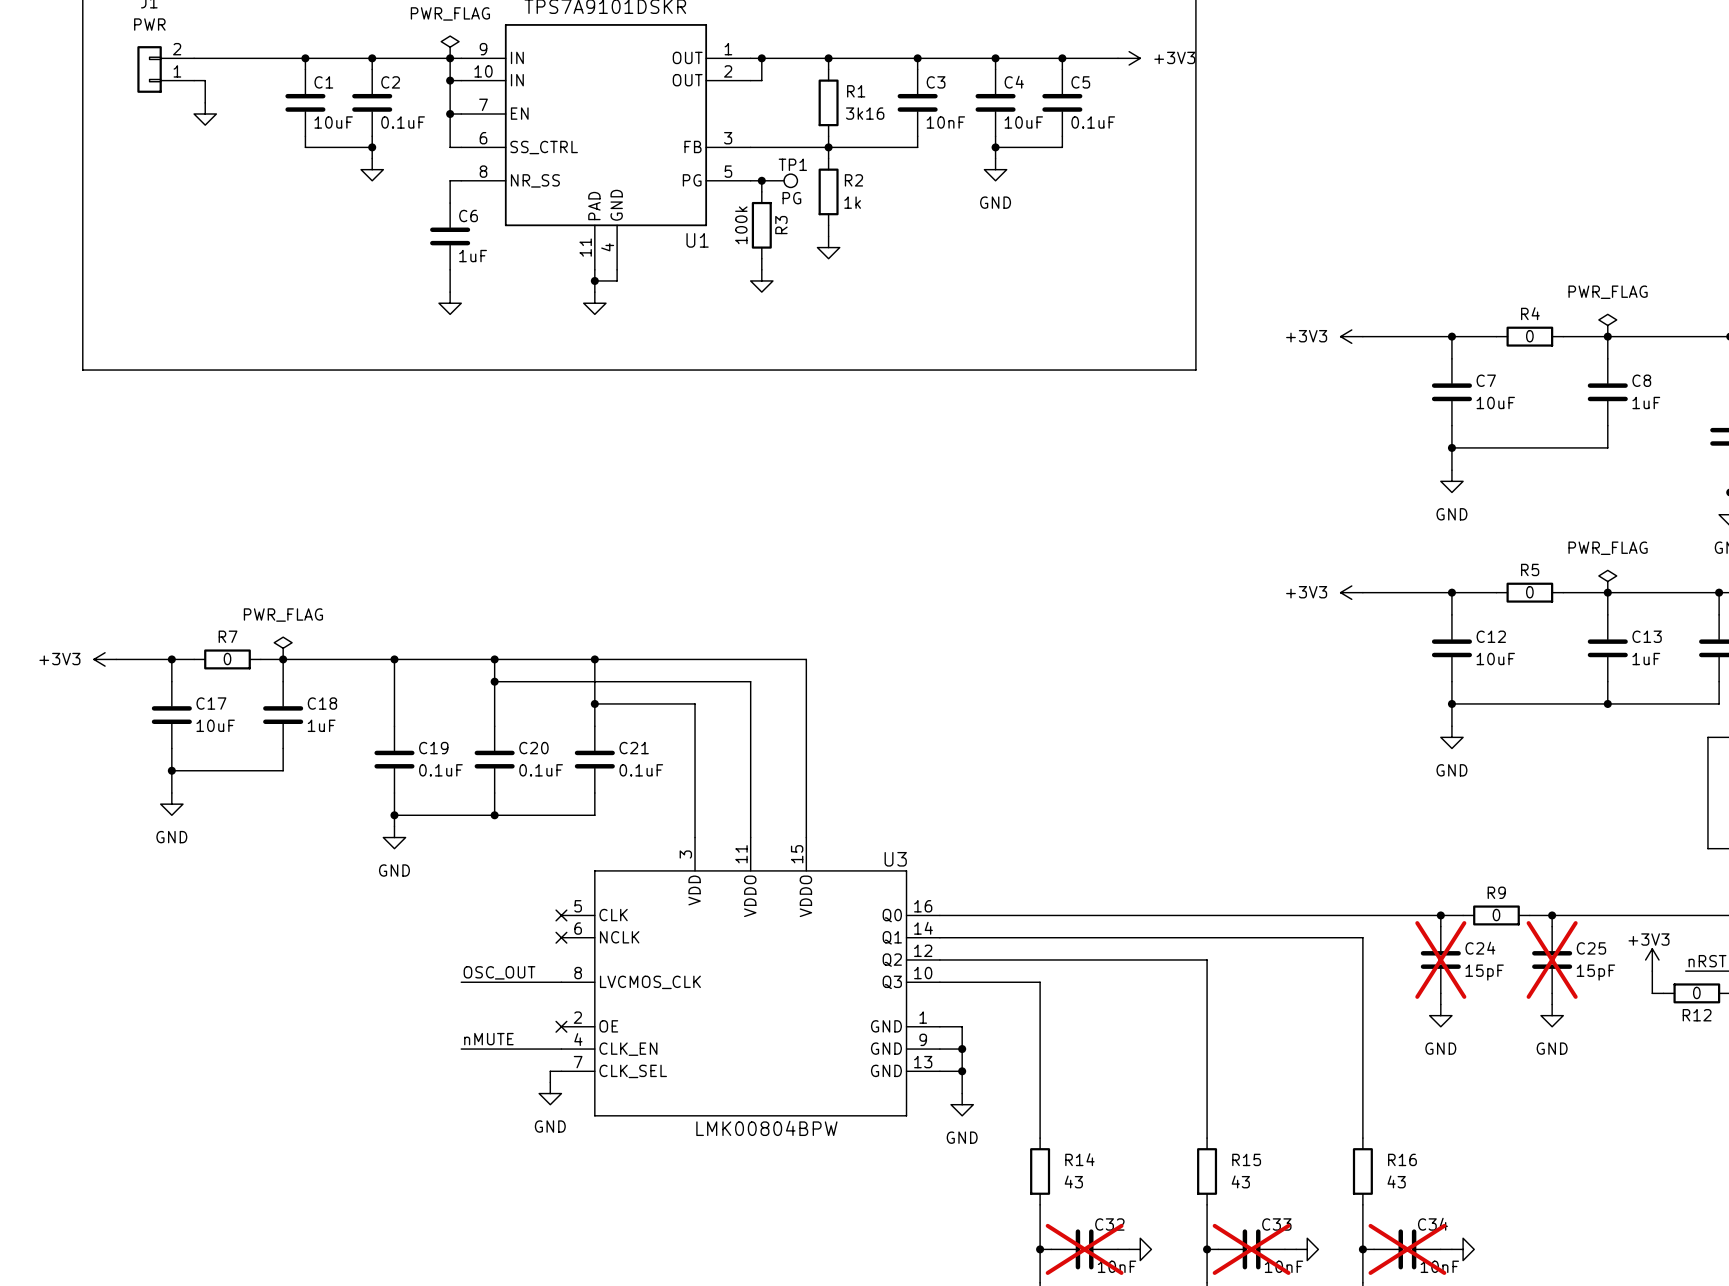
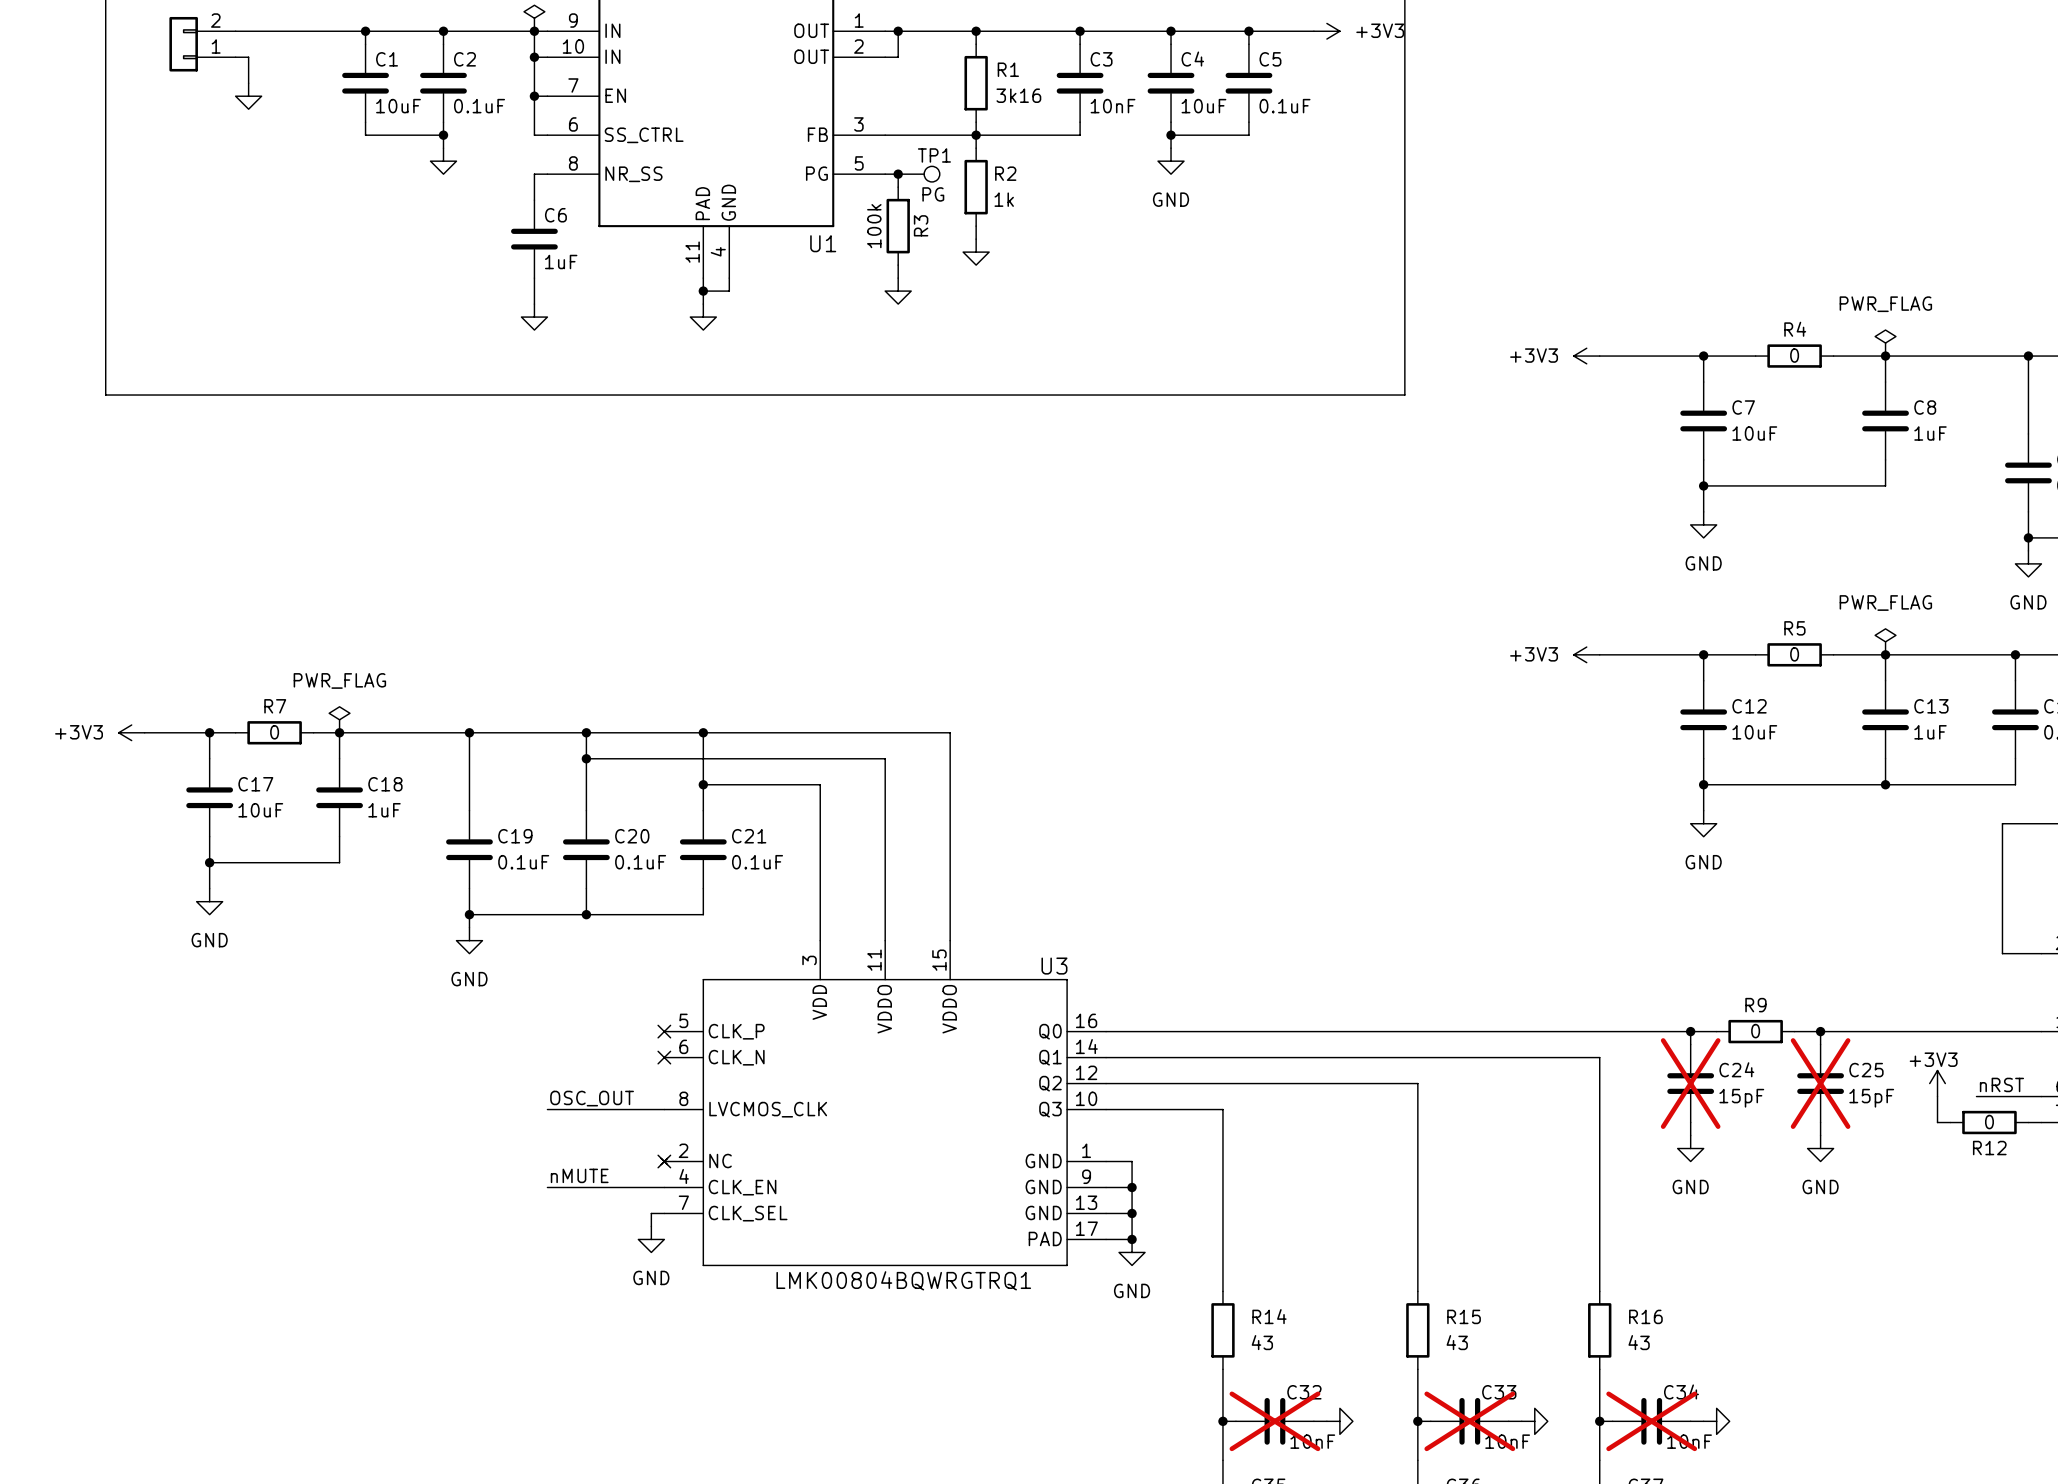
U3 symbol: [561, 837, 940, 1117] -> [661, 940, 1107, 1267]
wire: none -> (1106, 1239) (1132, 1239)
junction: none -> (1132, 1239)
U3 value: LMK00804BPW (766, 1128) -> LMK00804BQWRGTRQ1 (903, 1280)

